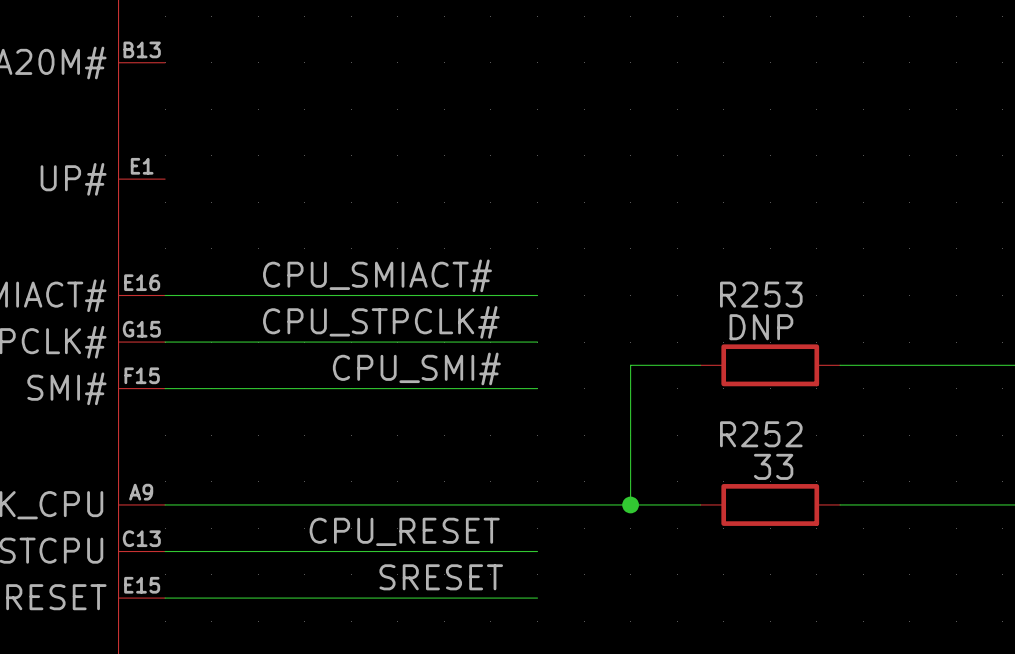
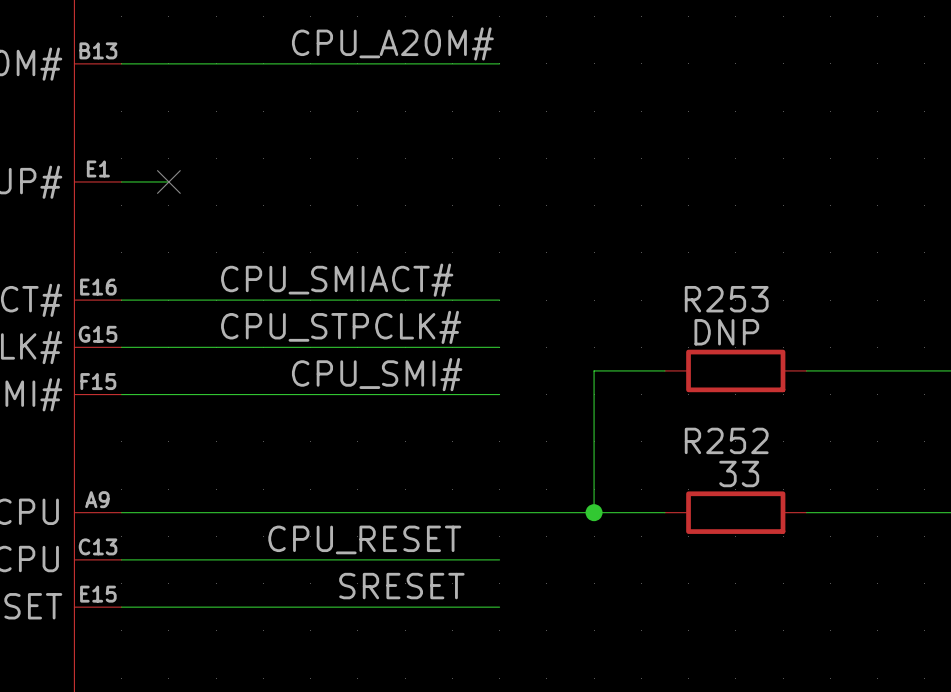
label: none -> CPU_A20M# (392, 43)
wire: none -> (121, 63) (499, 63)
wire: none -> (121, 181) (168, 181)
no-connect mark: none -> (168, 181)

